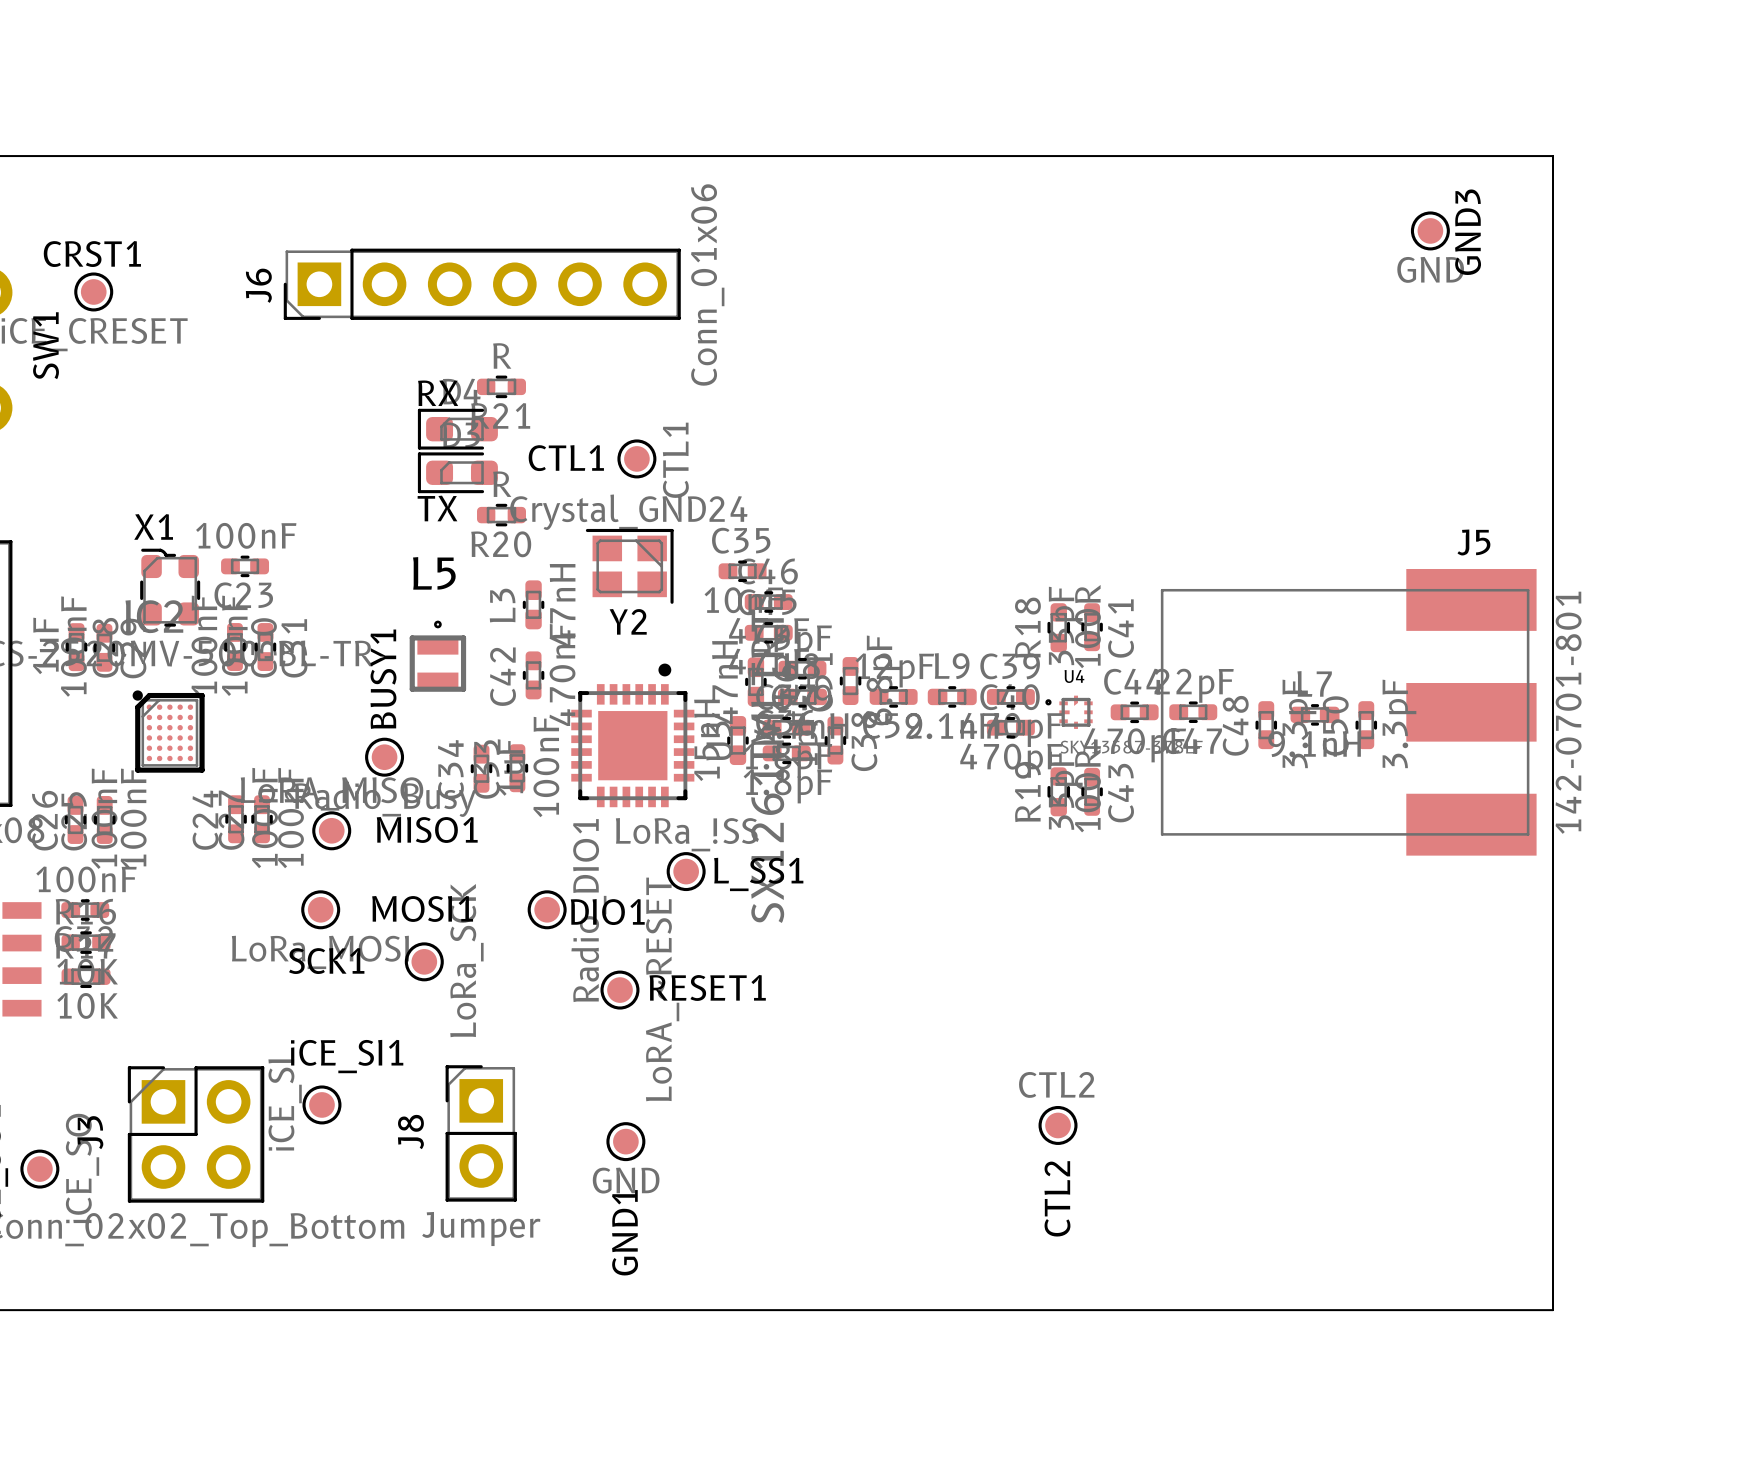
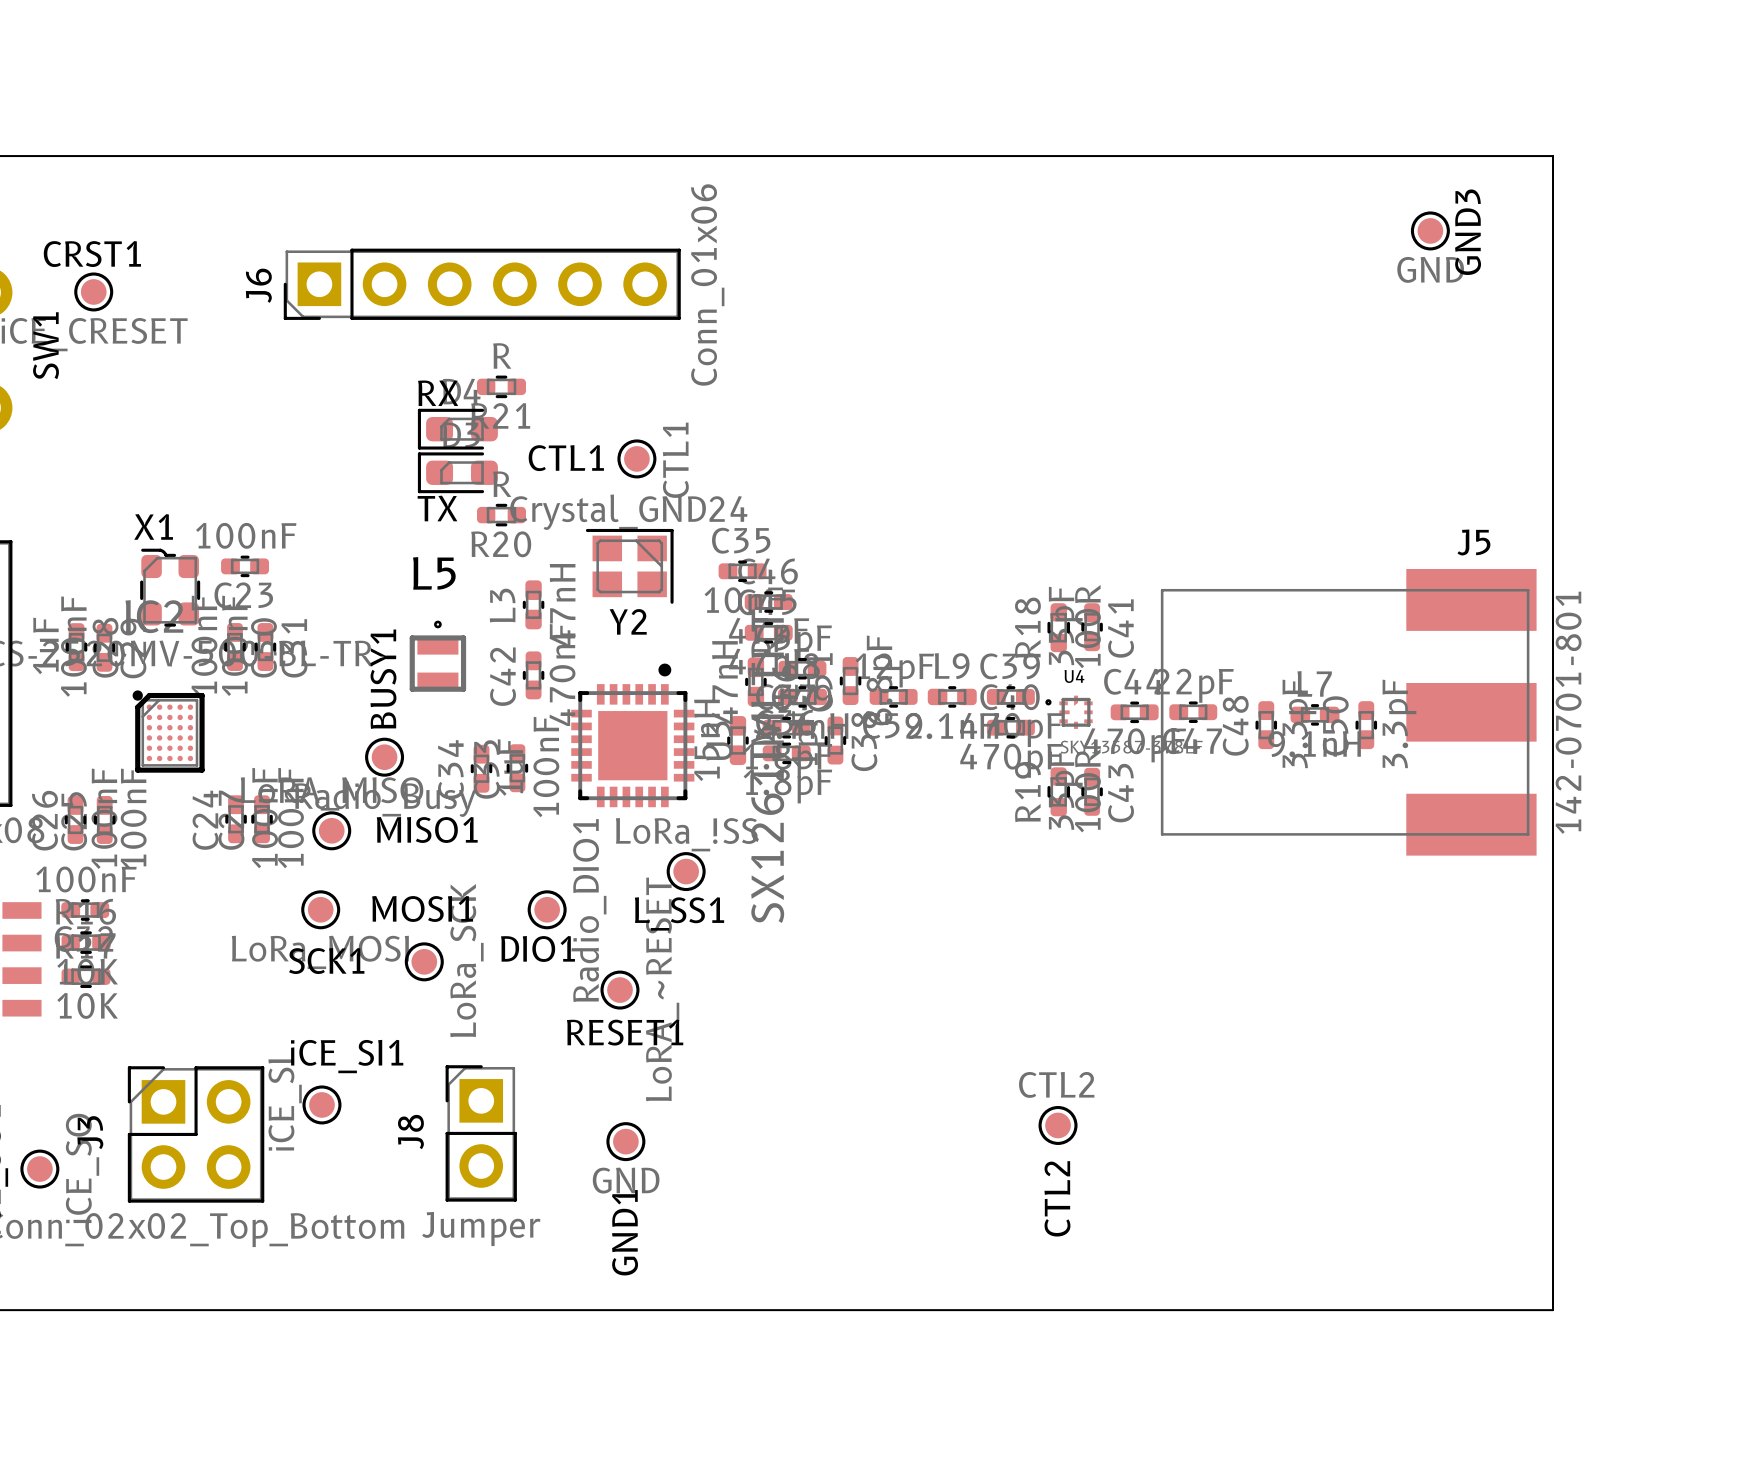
L_SS1 name position: L_SS1 (758, 874) -> L_SS1 (679, 913)
DIO1 name position: DIO1 (607, 912) -> DIO1 (538, 948)
RESET1 name position: RESET1 (707, 987) -> RESET1 (625, 1032)

